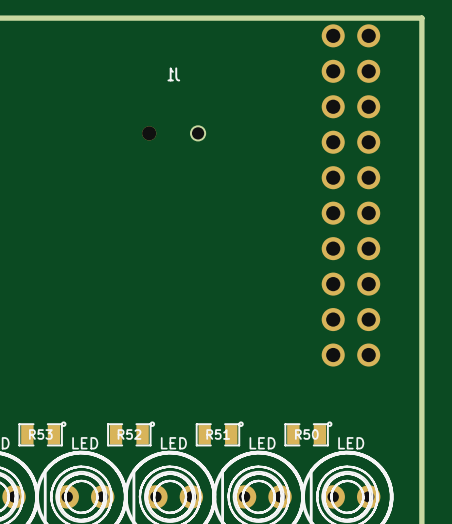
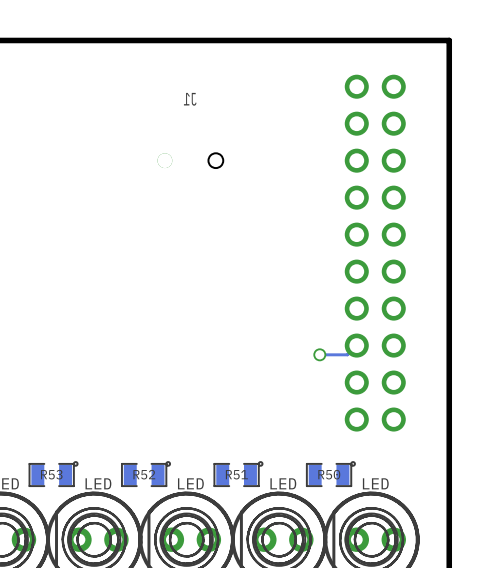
part position: (350, 195) -> (375, 253)
track: none -> (356, 345) (347, 354) (319, 354)
via: none -> (319, 354)

